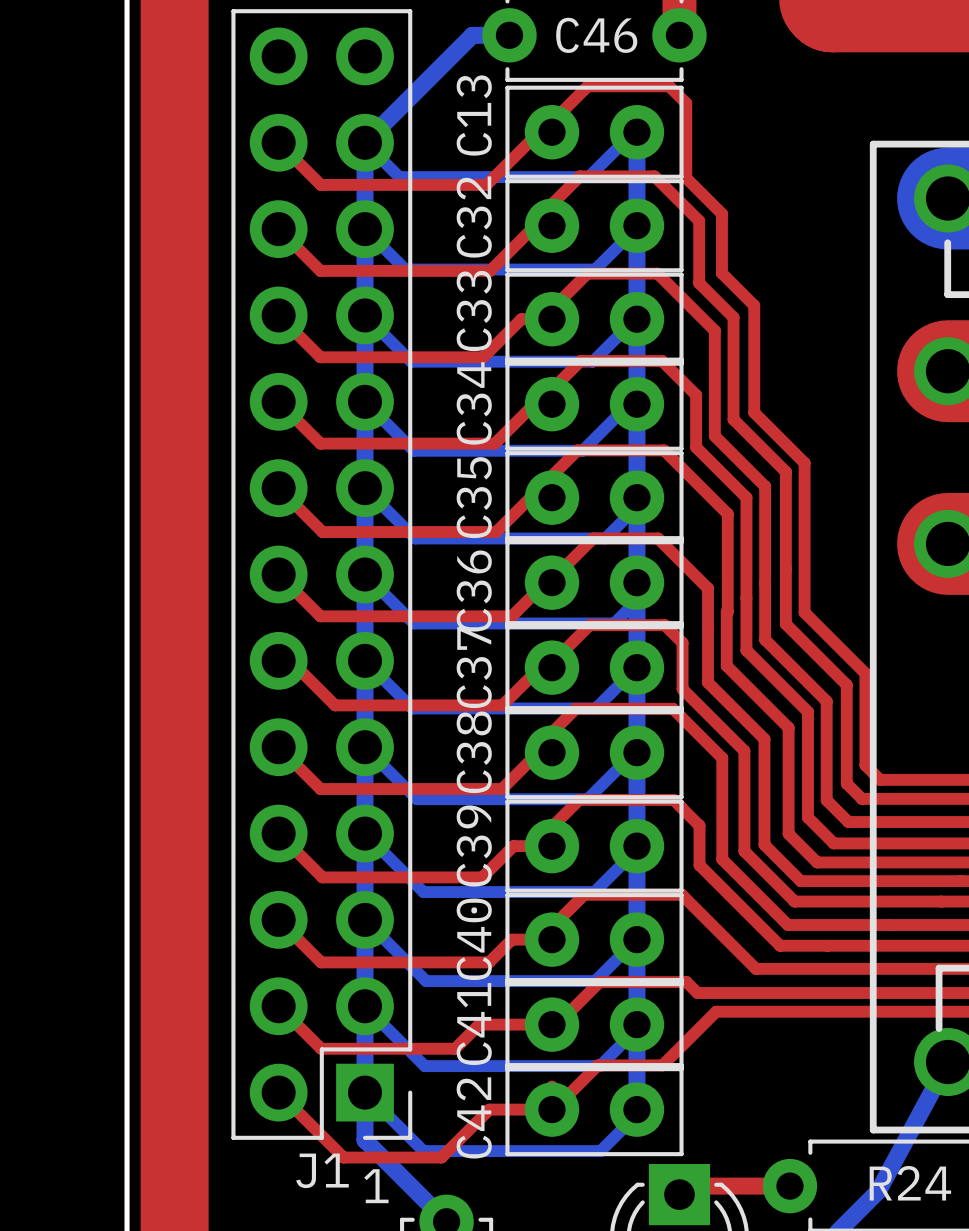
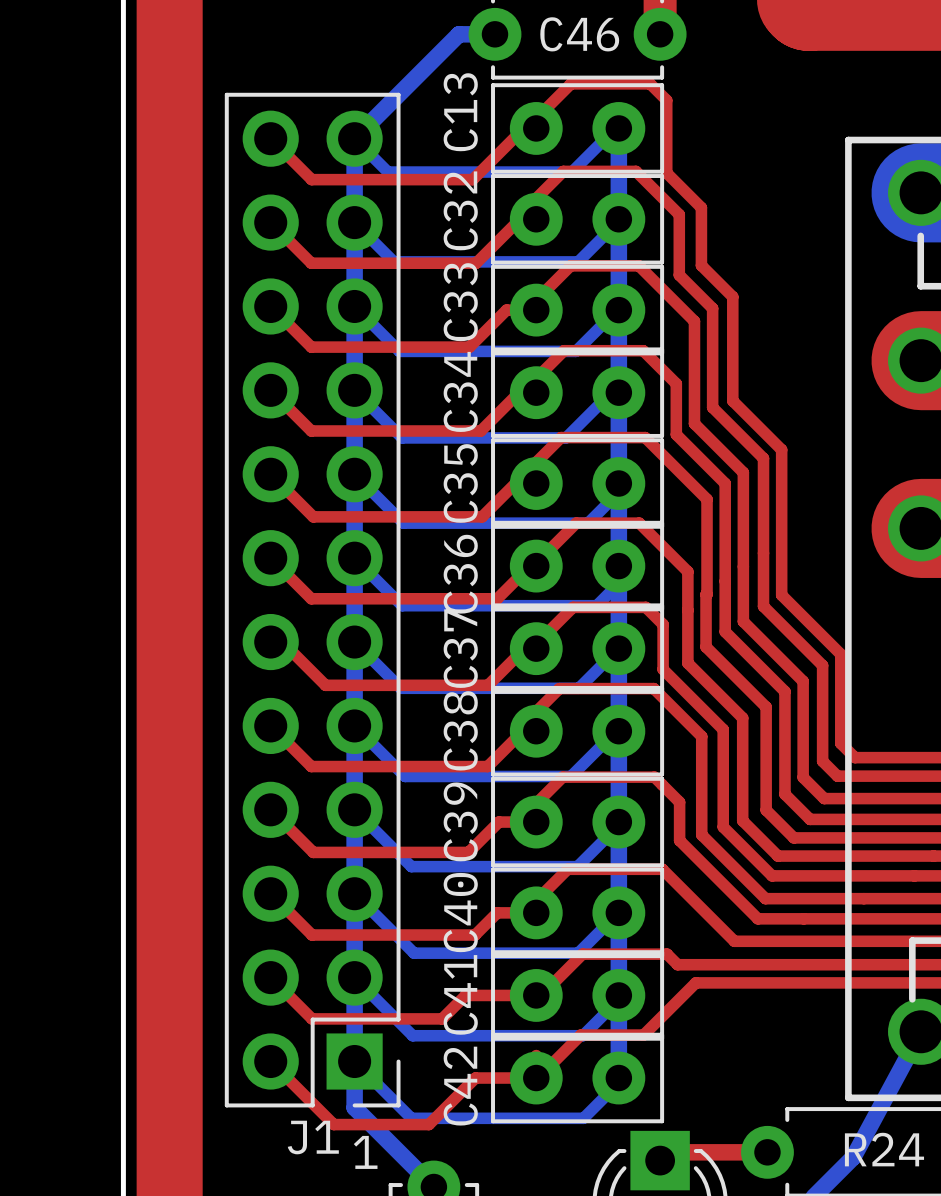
J1 footprint: [231, 9, 413, 1140] -> [224, 92, 401, 1108]

